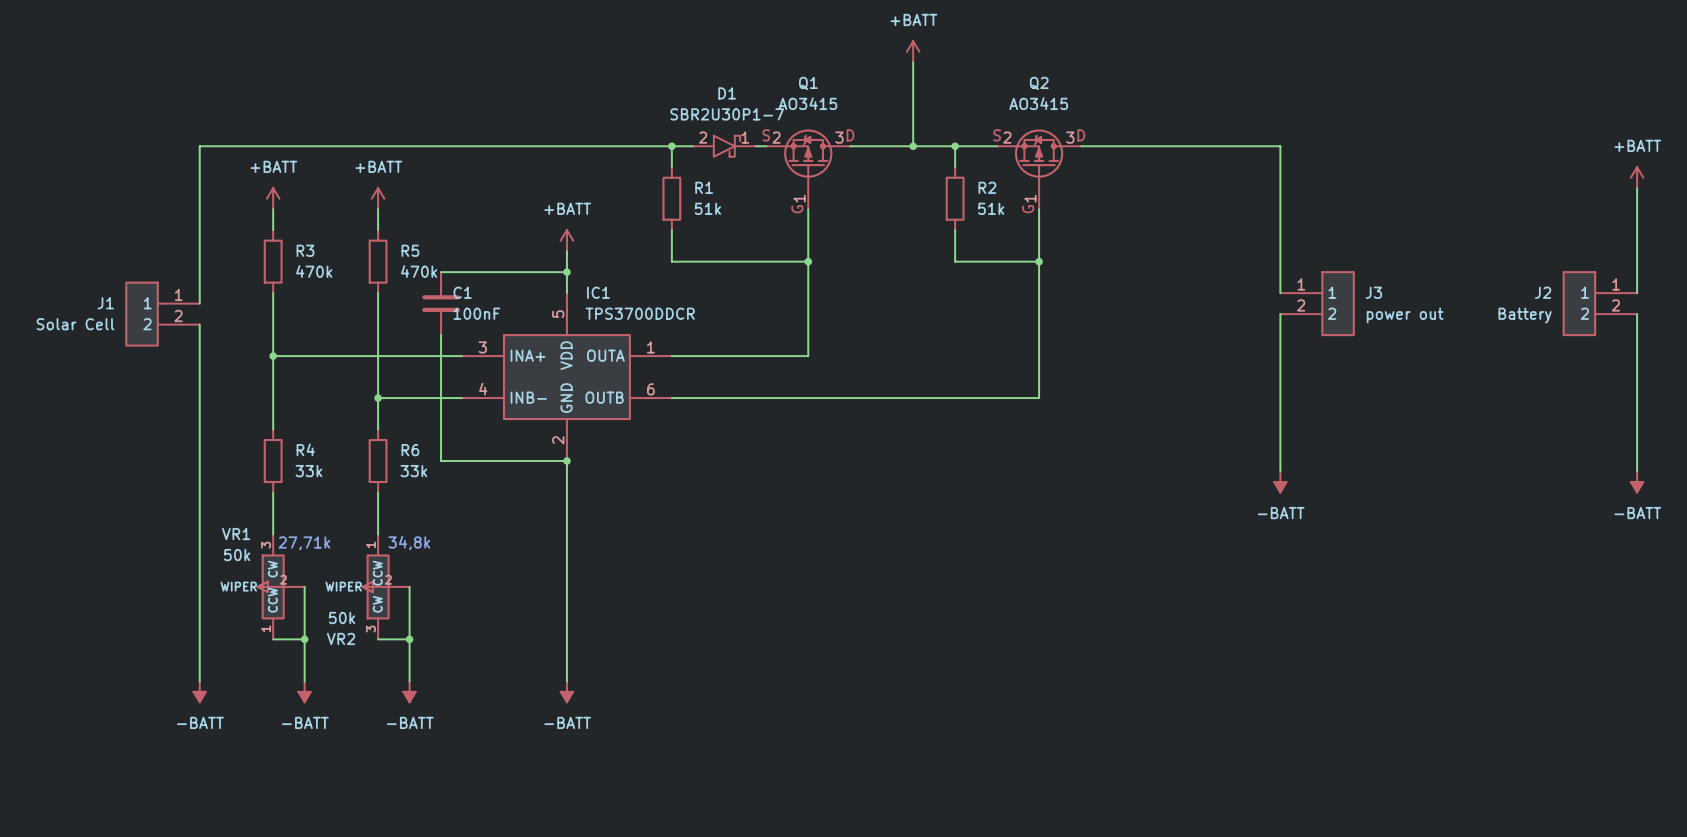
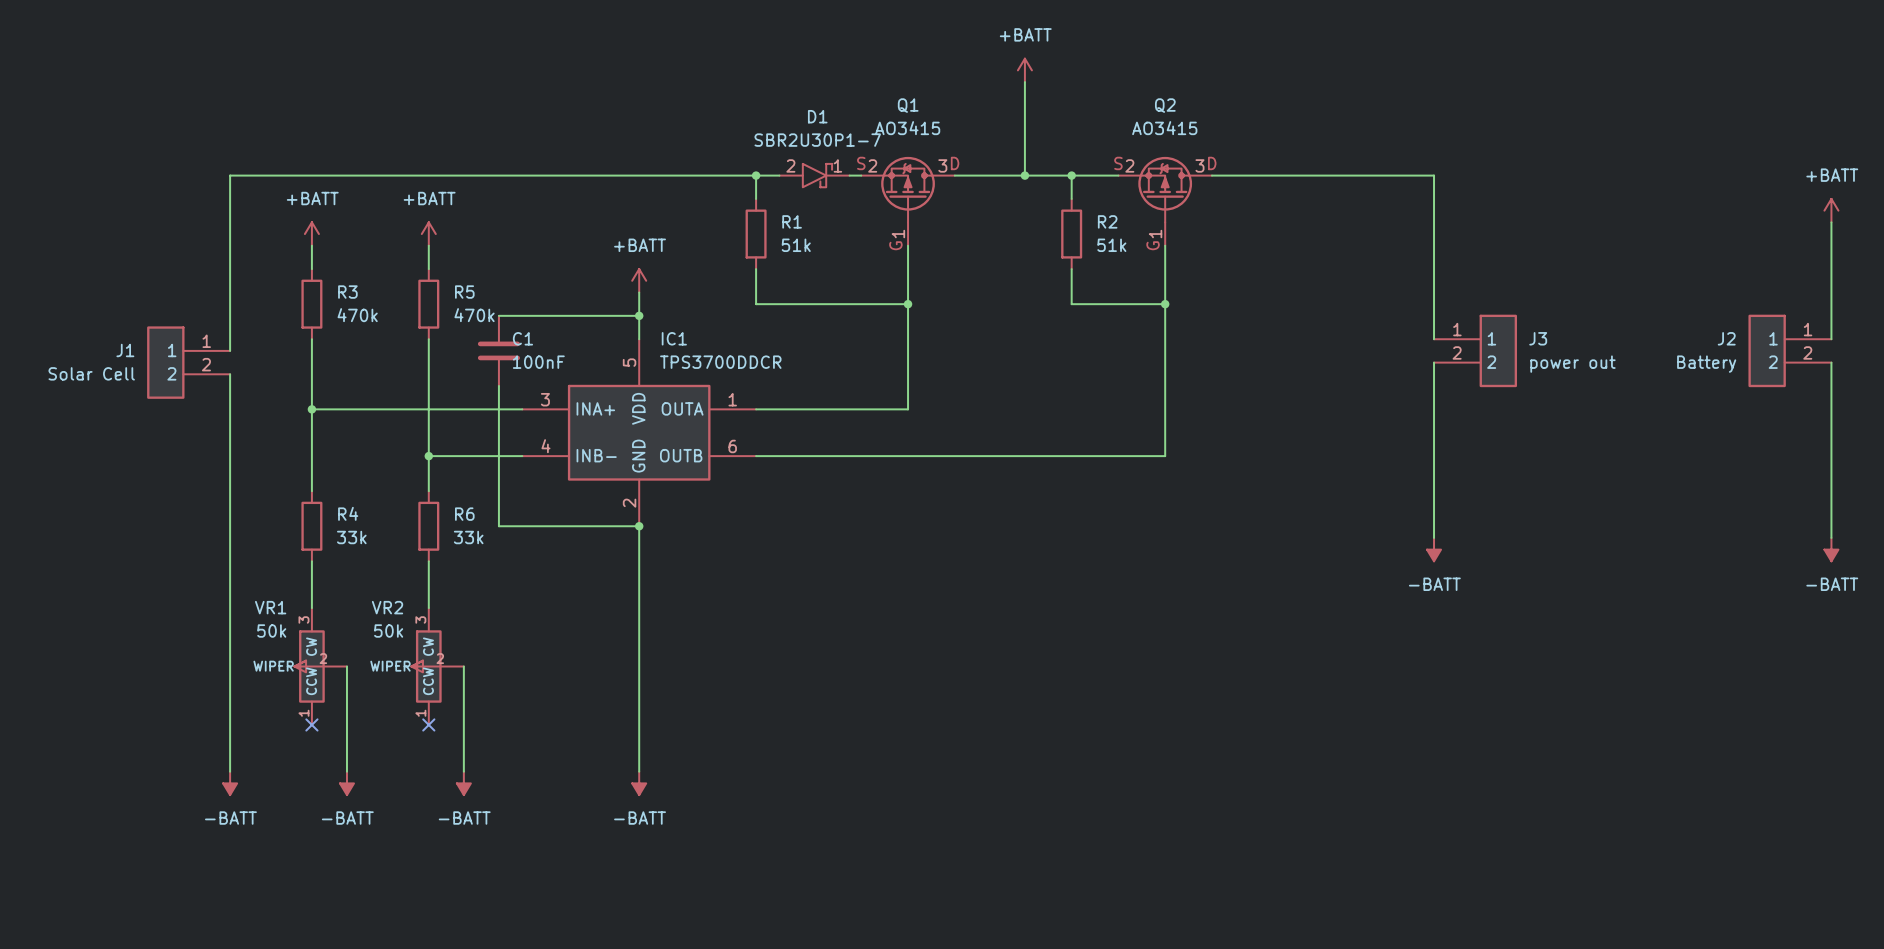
text: 34,8k (409, 542) -> none
text: 27,71k (304, 543) -> none
VR2 flip: as is (376, 586) -> up-down (426, 666)
wire: (273, 639) (304, 639) -> none
no-connect mark: none -> (311, 724)
junction: (304, 639) -> none
wire: (378, 639) (409, 639) -> none
no-connect mark: none -> (428, 724)
junction: (409, 639) -> none

